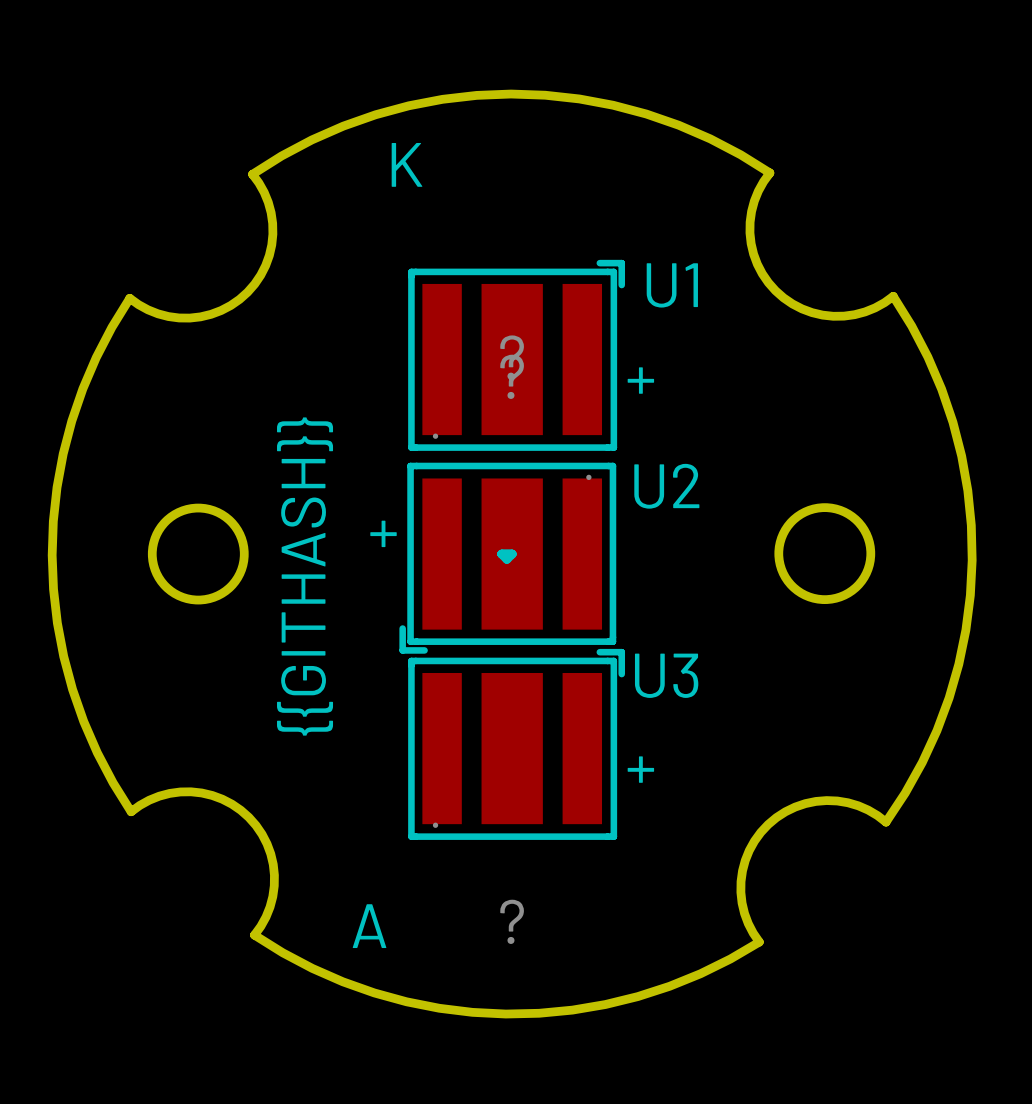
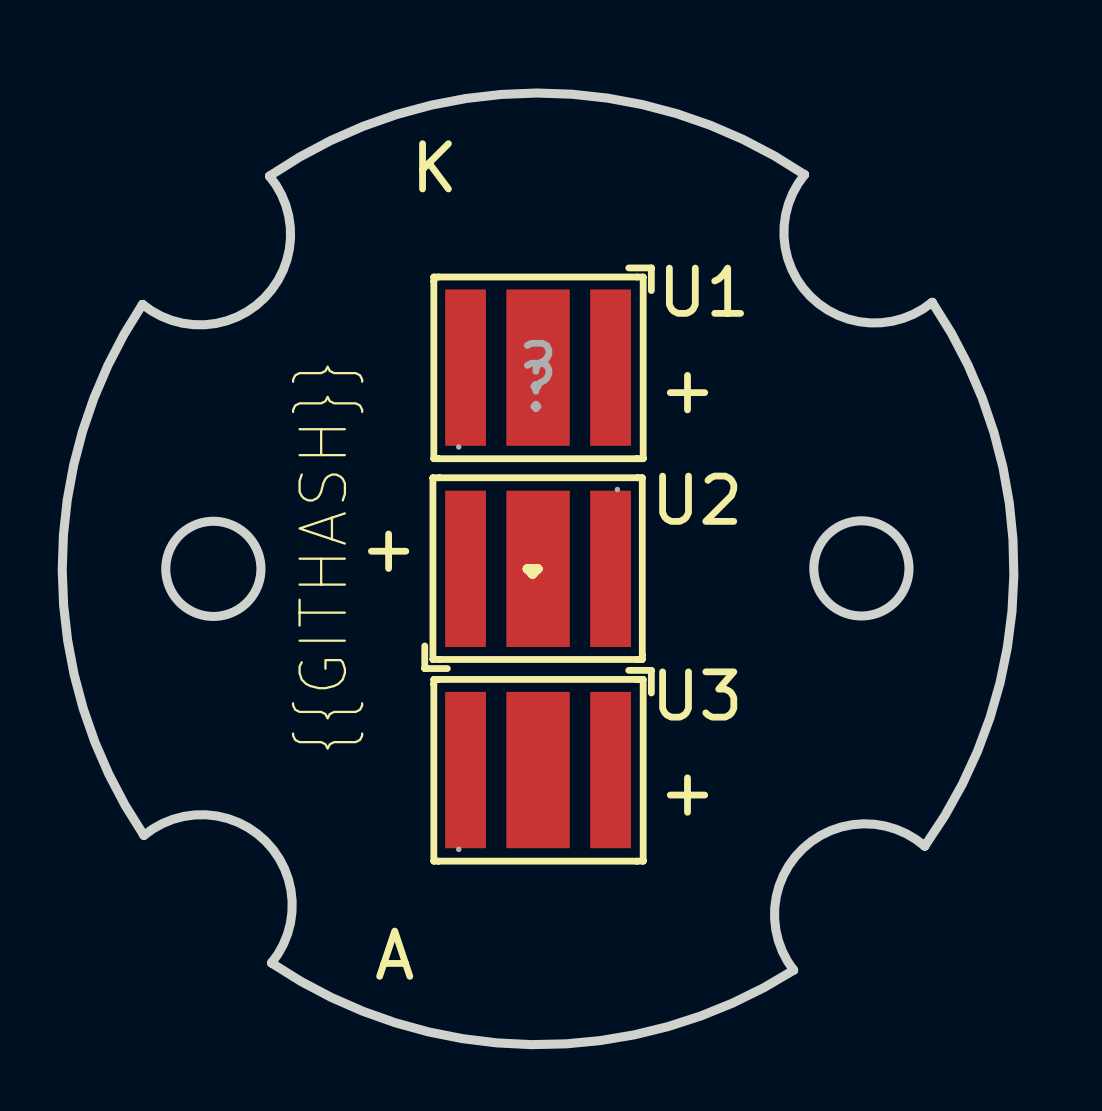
U3 value: ? (512, 921) -> none

